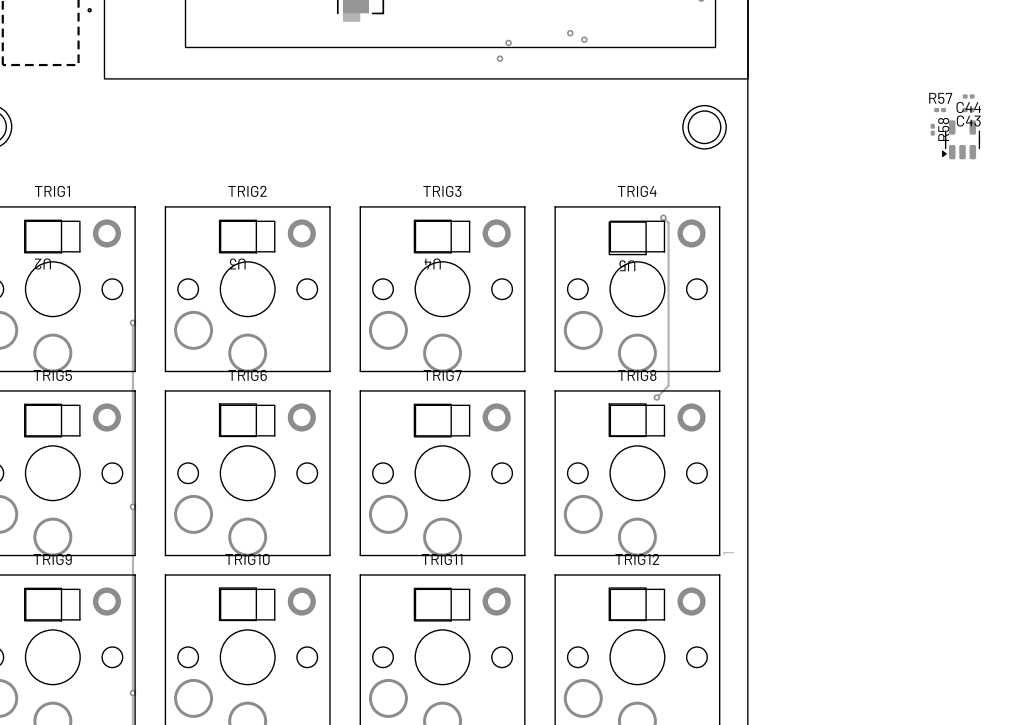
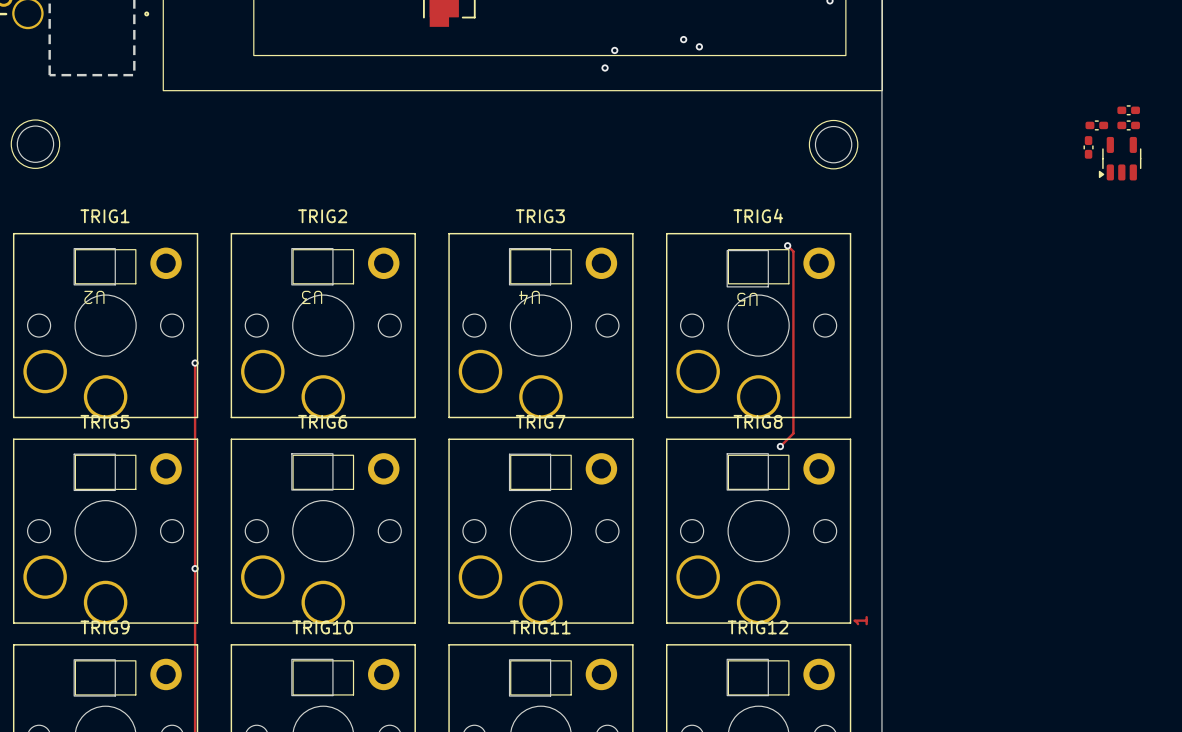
C44: (968, 96) -> none
part: none -> (1128, 110)
R57: (940, 110) -> none
part: none -> (1096, 125)
C43: (968, 110) -> none
part: none -> (1128, 125)
R58: (932, 129) -> none
part: none -> (1088, 147)

